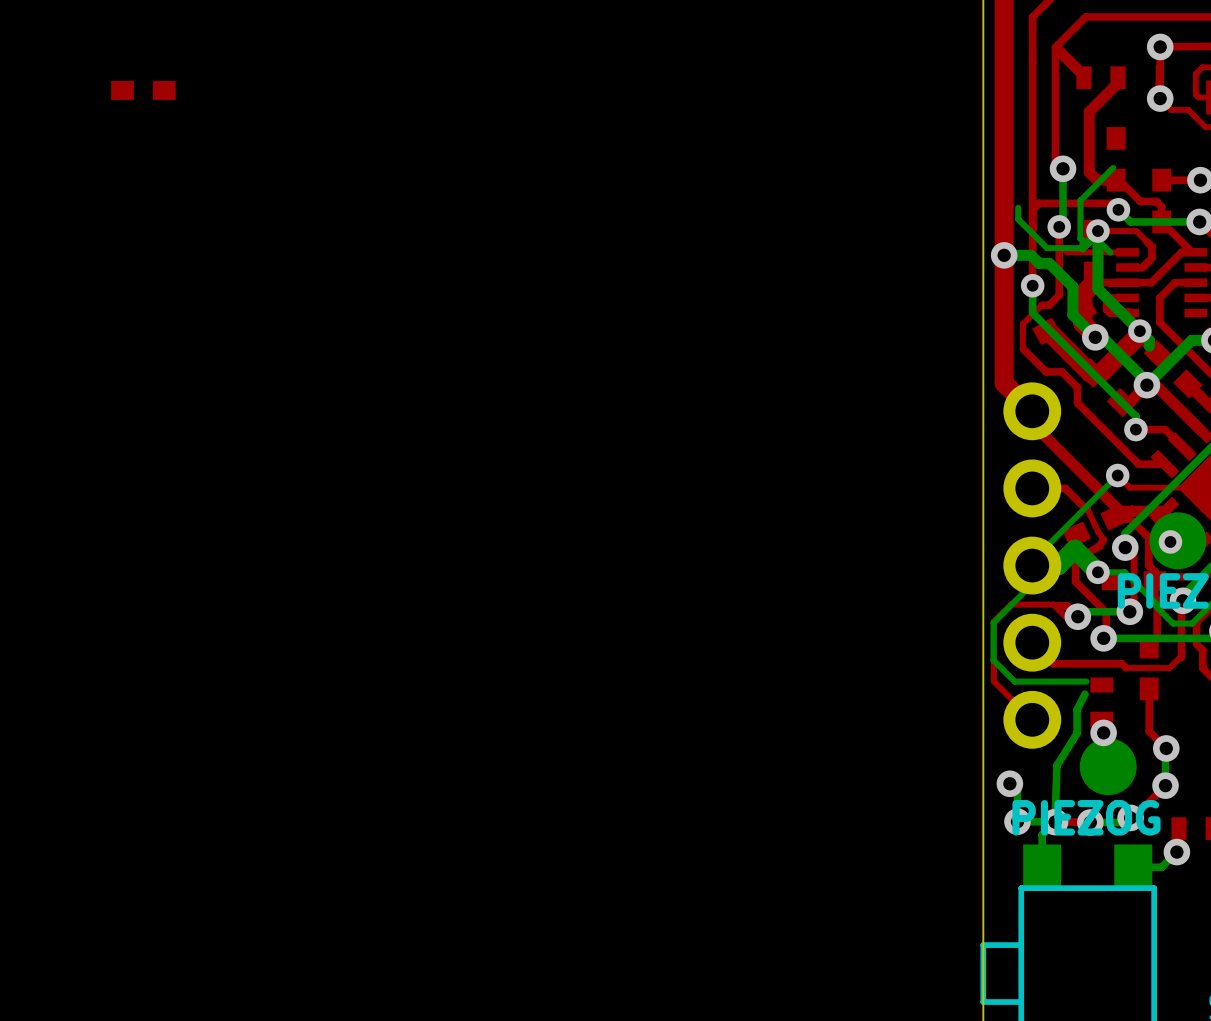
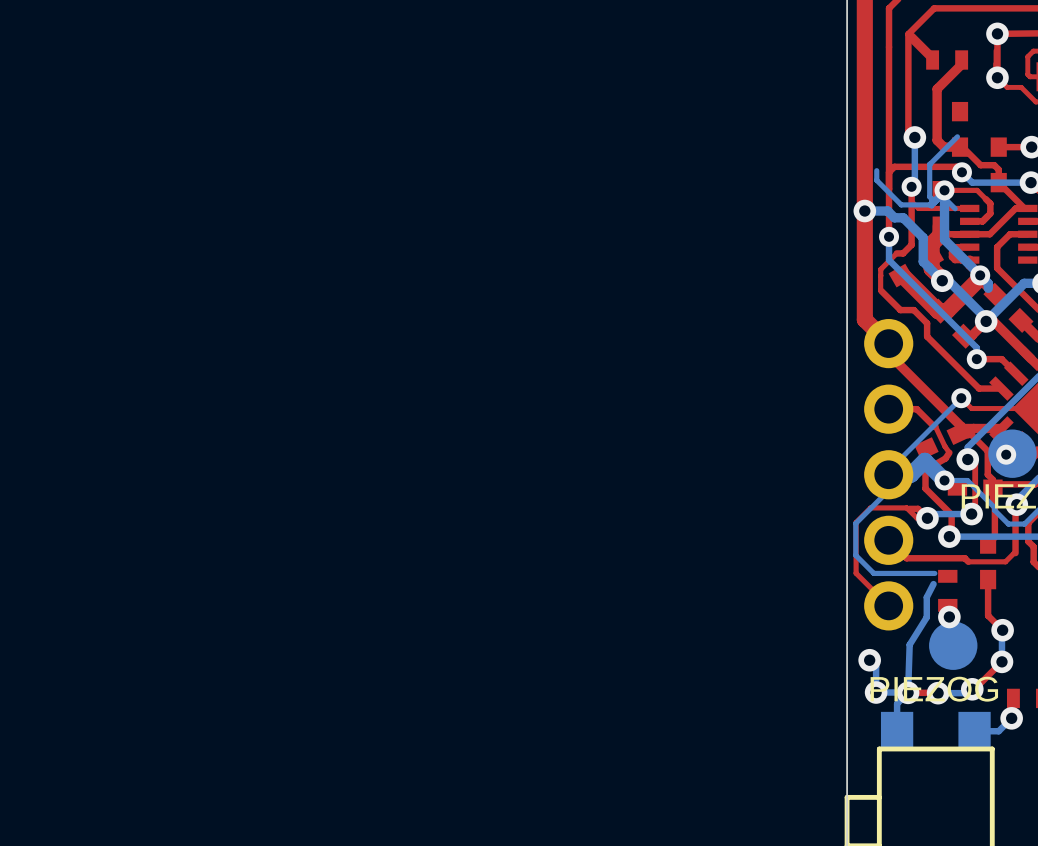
part: (143, 90) -> none

